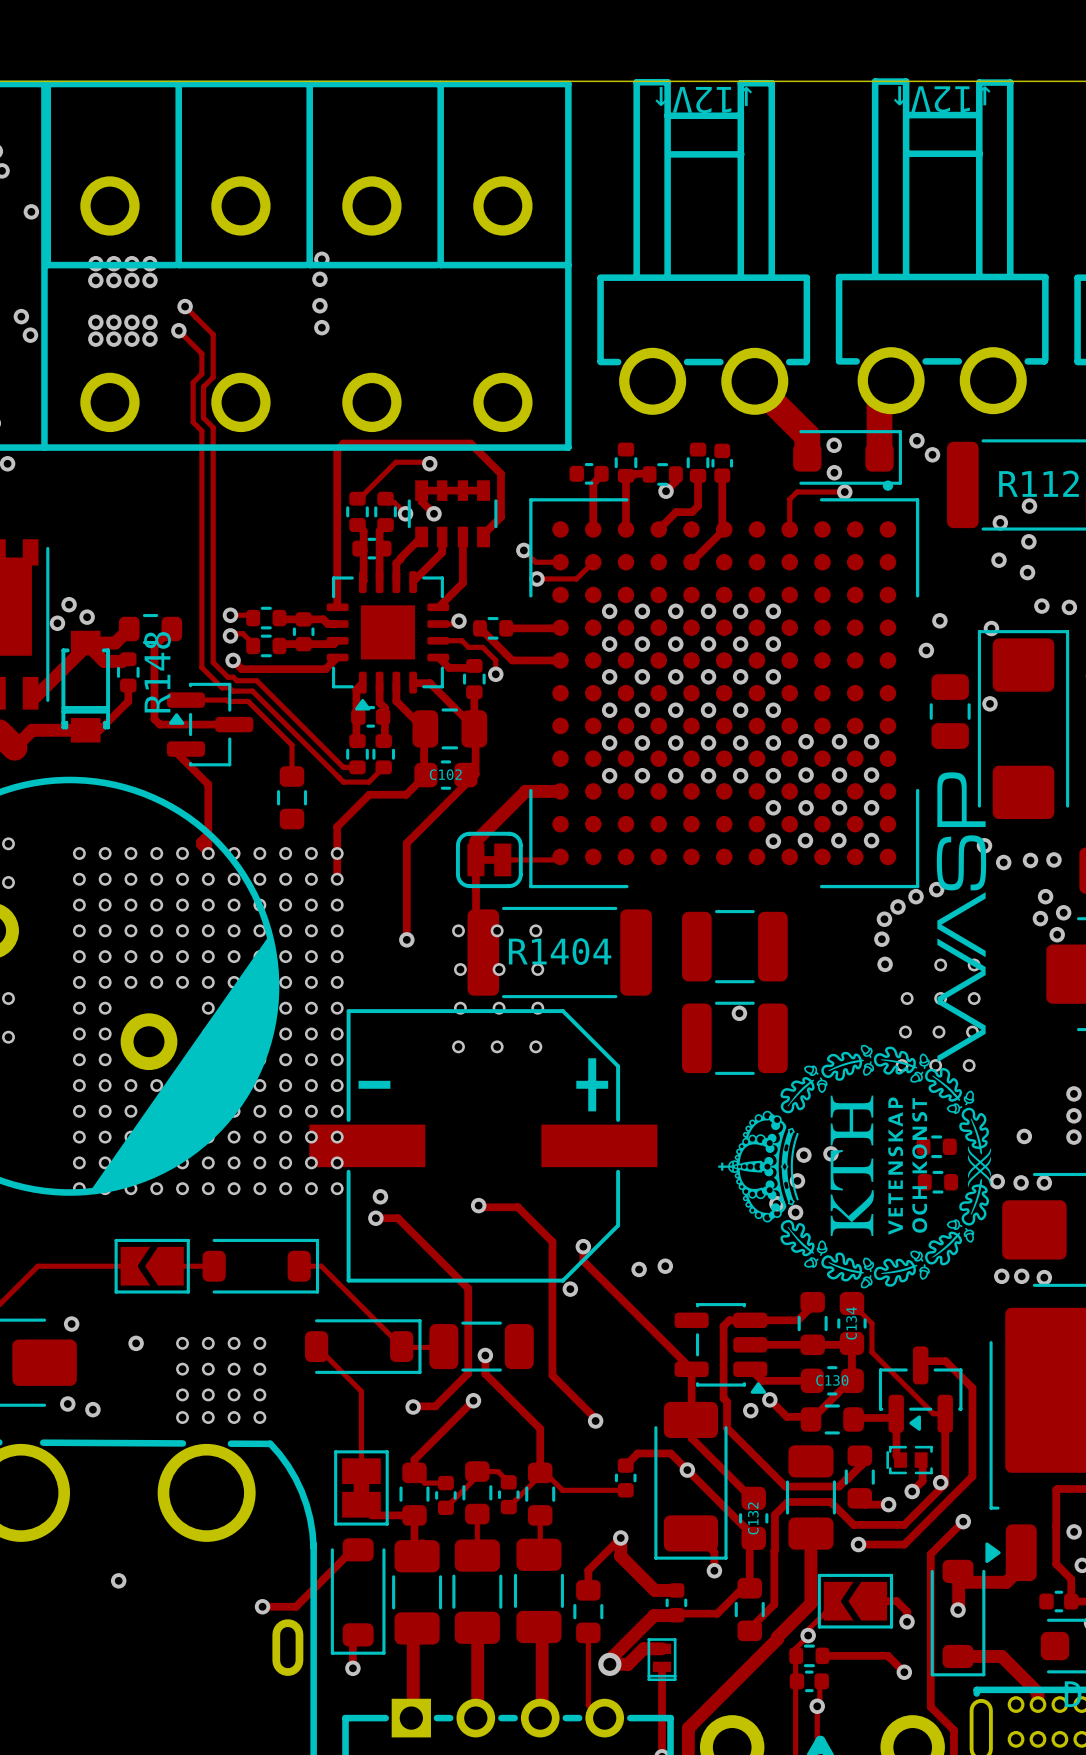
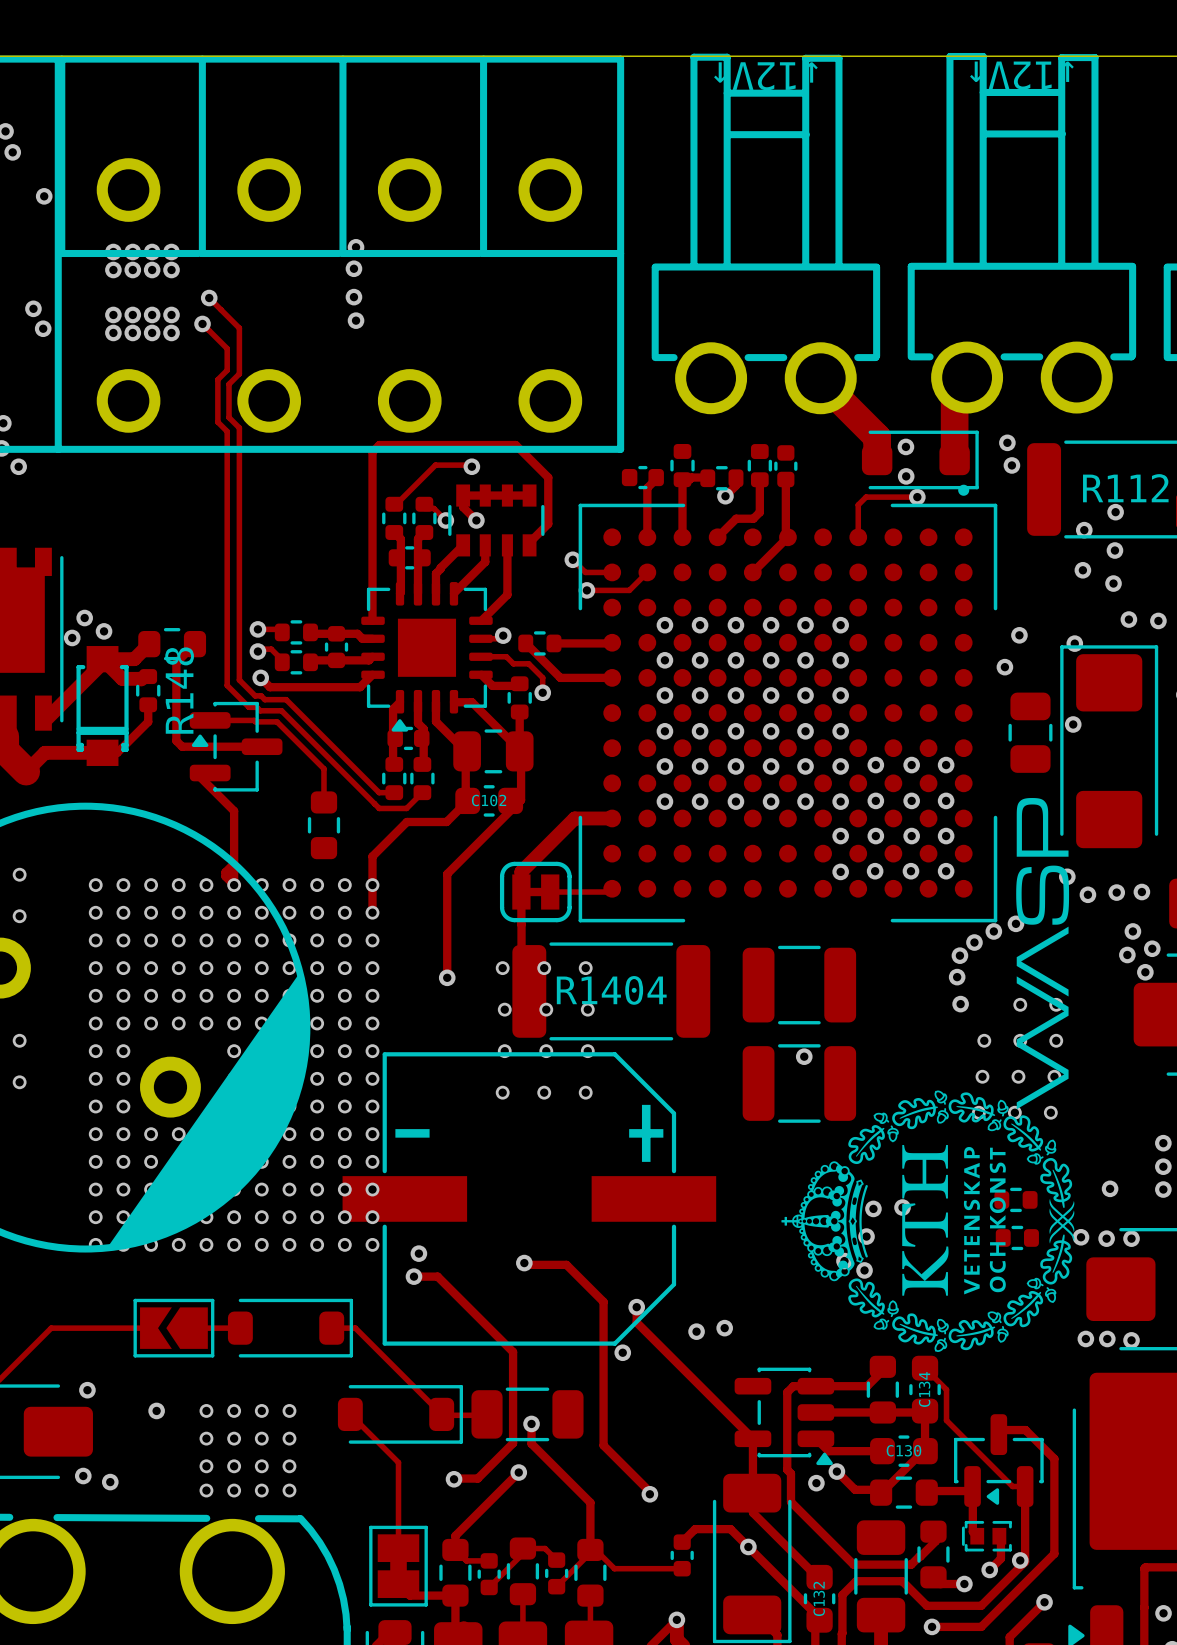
via: (916, 440) -> none
via: none -> (1007, 442)
via: (932, 454) -> none
via: none -> (1011, 465)

